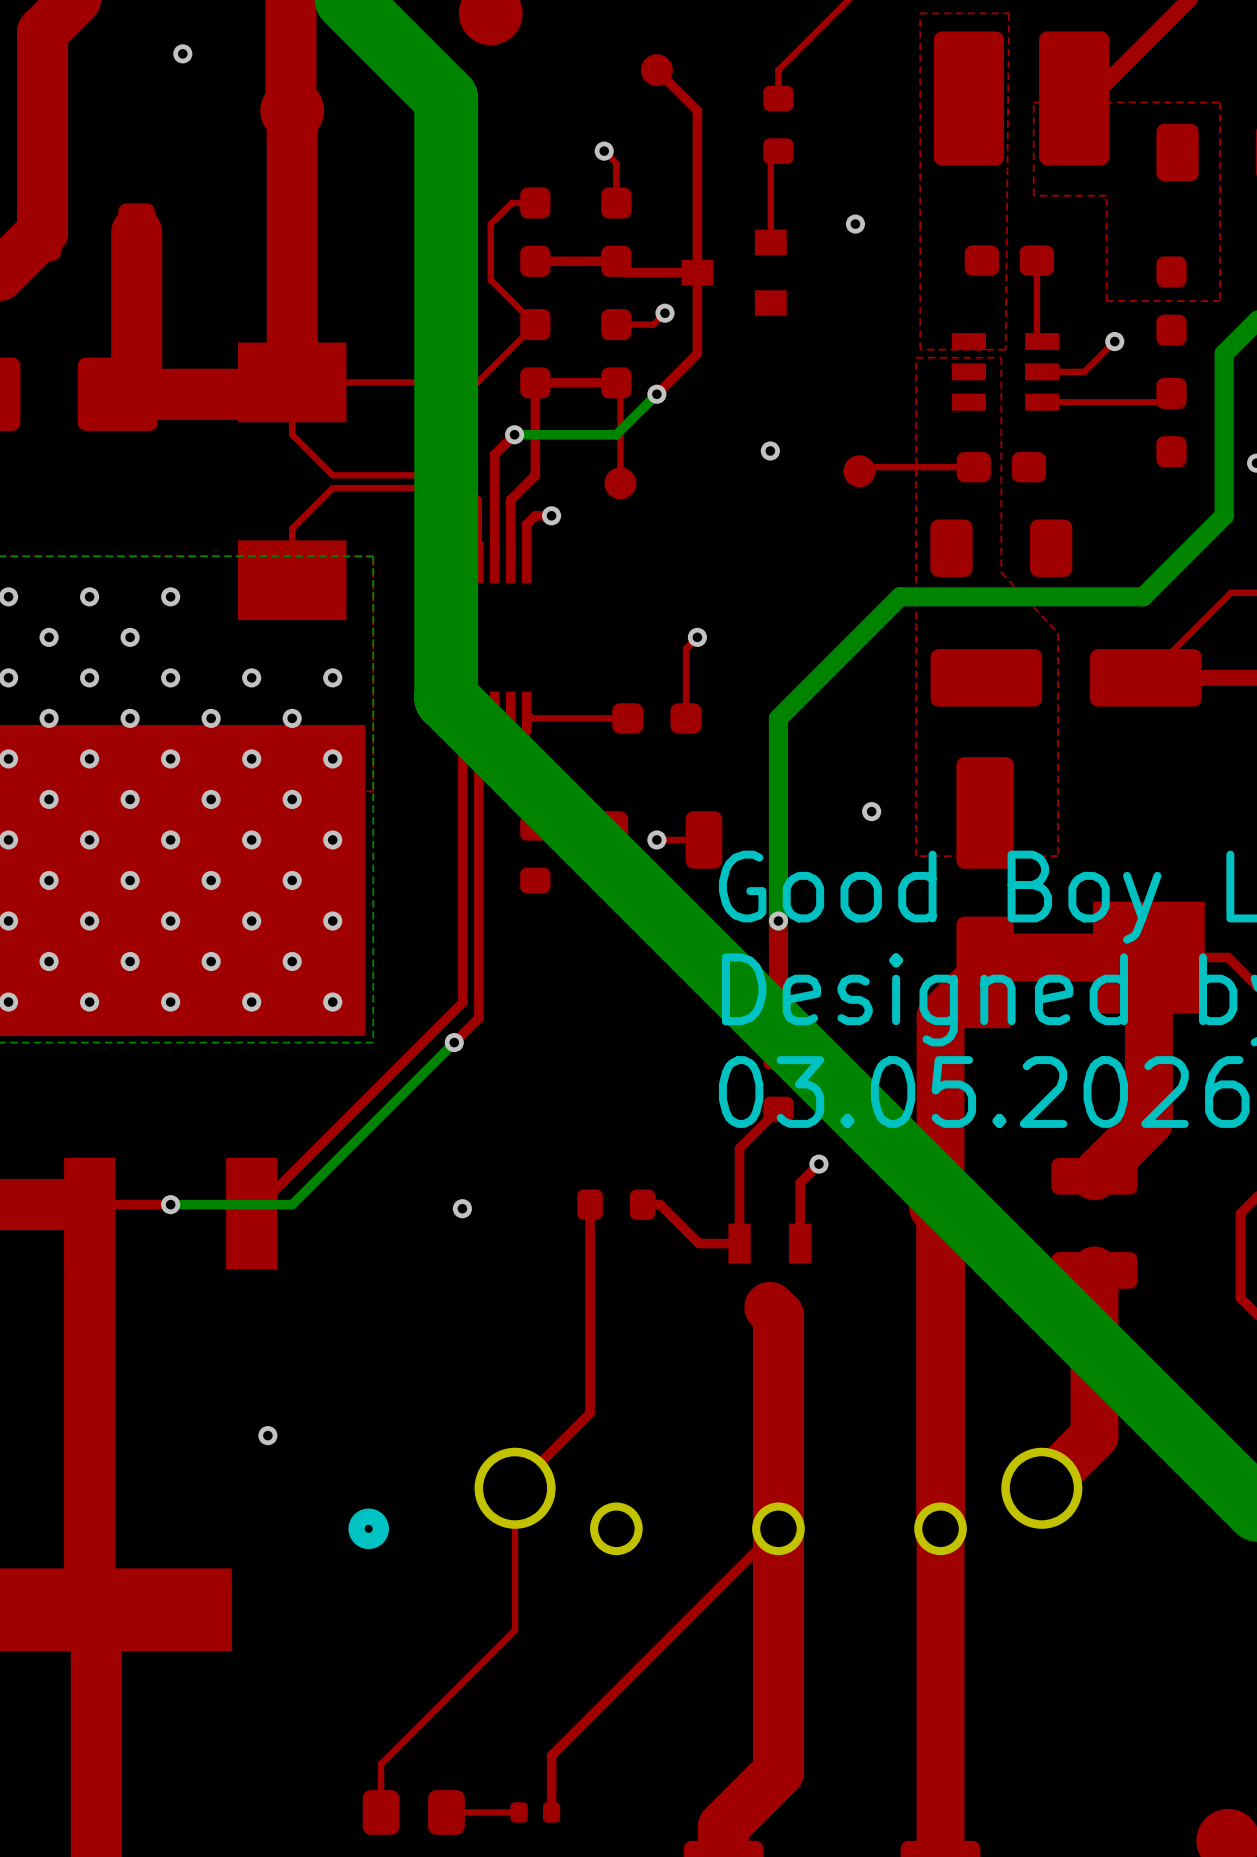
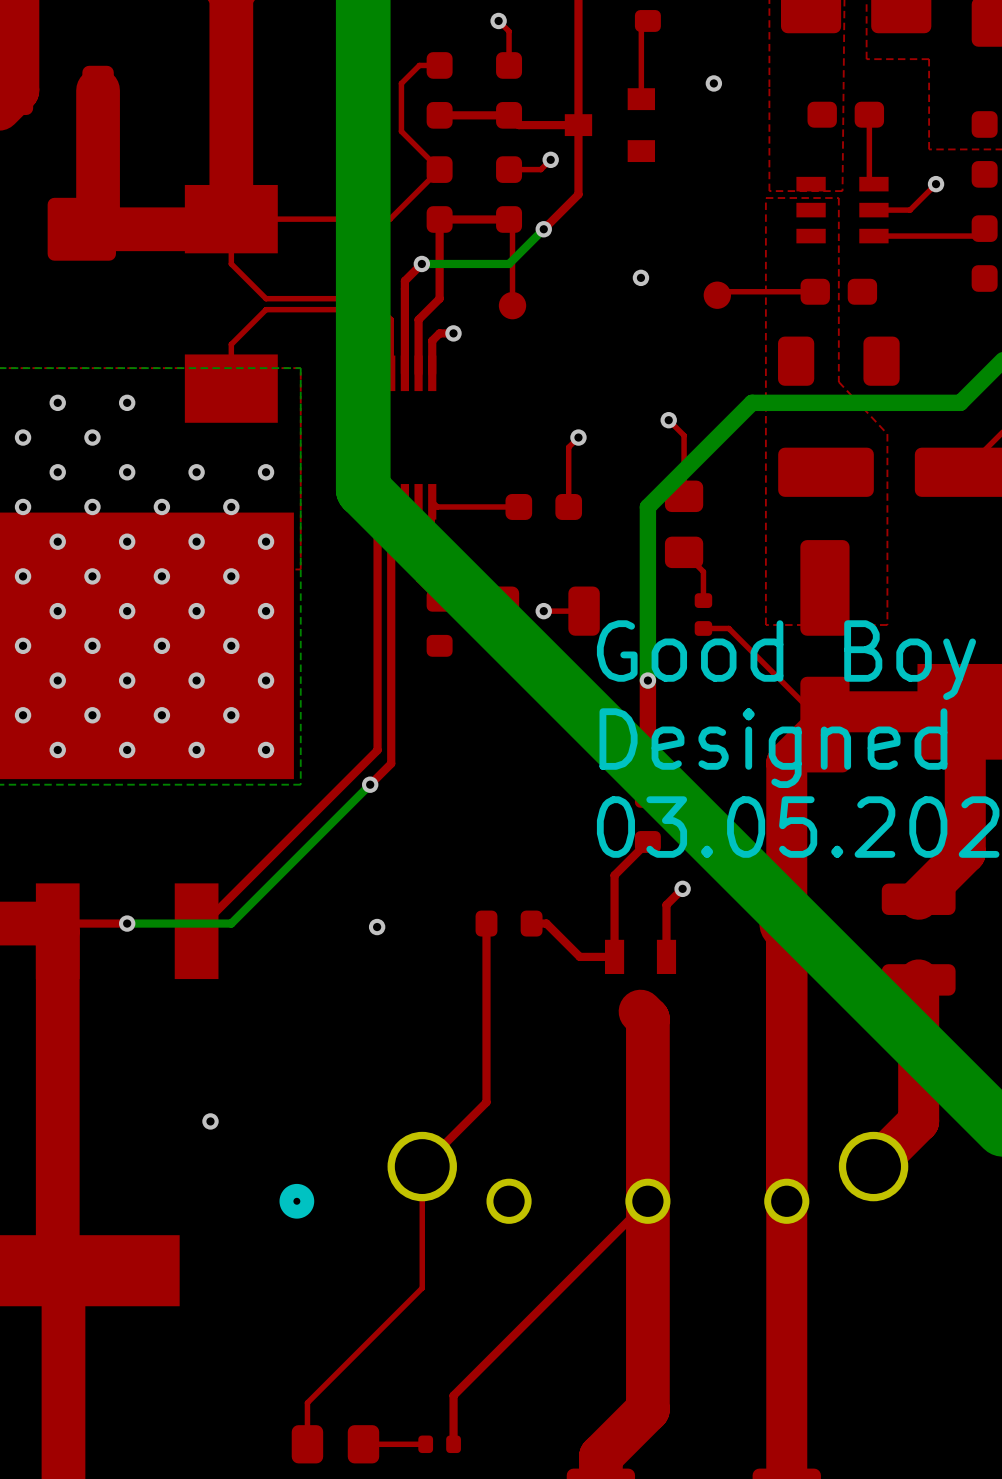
top track: none -> (668, 420) (684, 435) (684, 496)
via: none -> (668, 420)
part: none -> (684, 524)
top track: none -> (684, 552) (703, 571) (703, 600)
via: (871, 811) -> none
part: none -> (703, 614)
top track: none -> (710, 628) (728, 628) (824, 724)

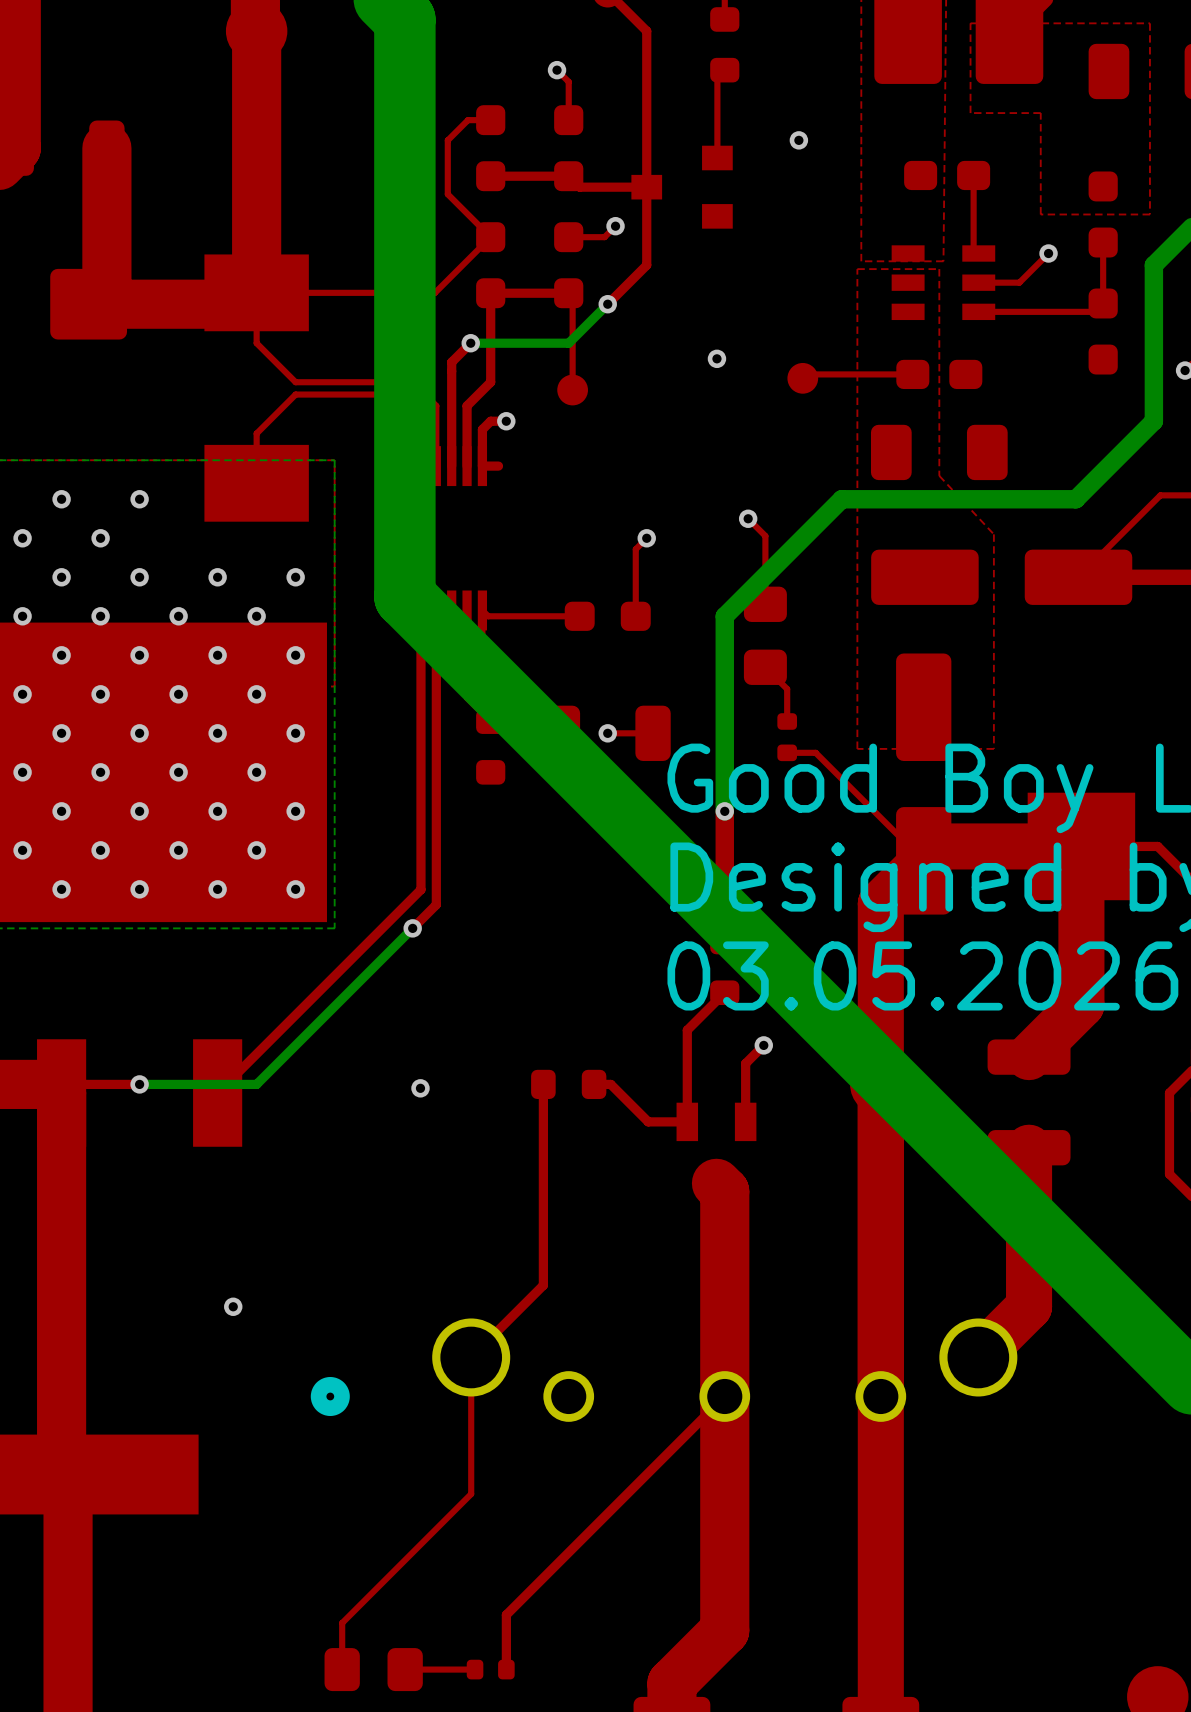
top track: none -> (1103, 242) (1103, 303)
top track: none -> (498, 466) (482, 466)

